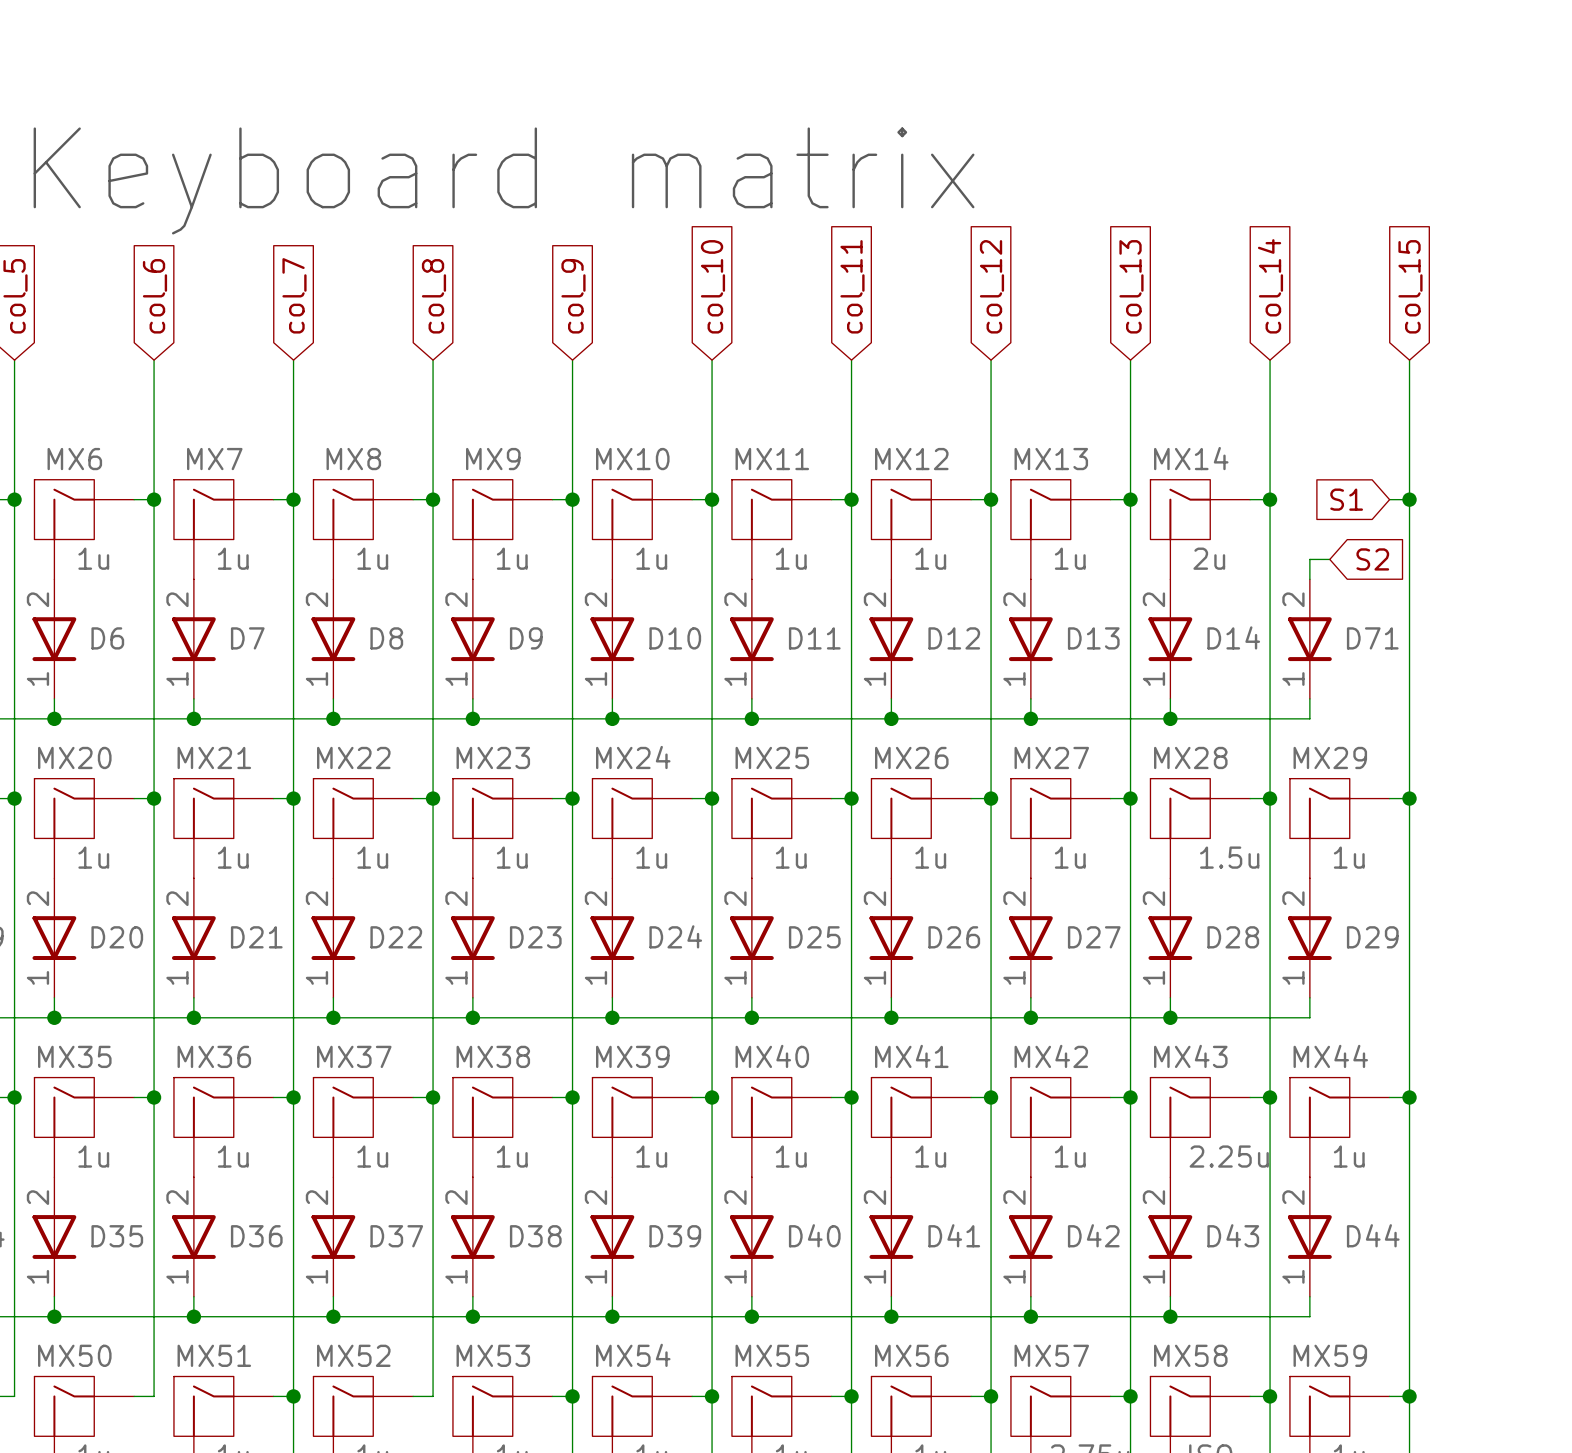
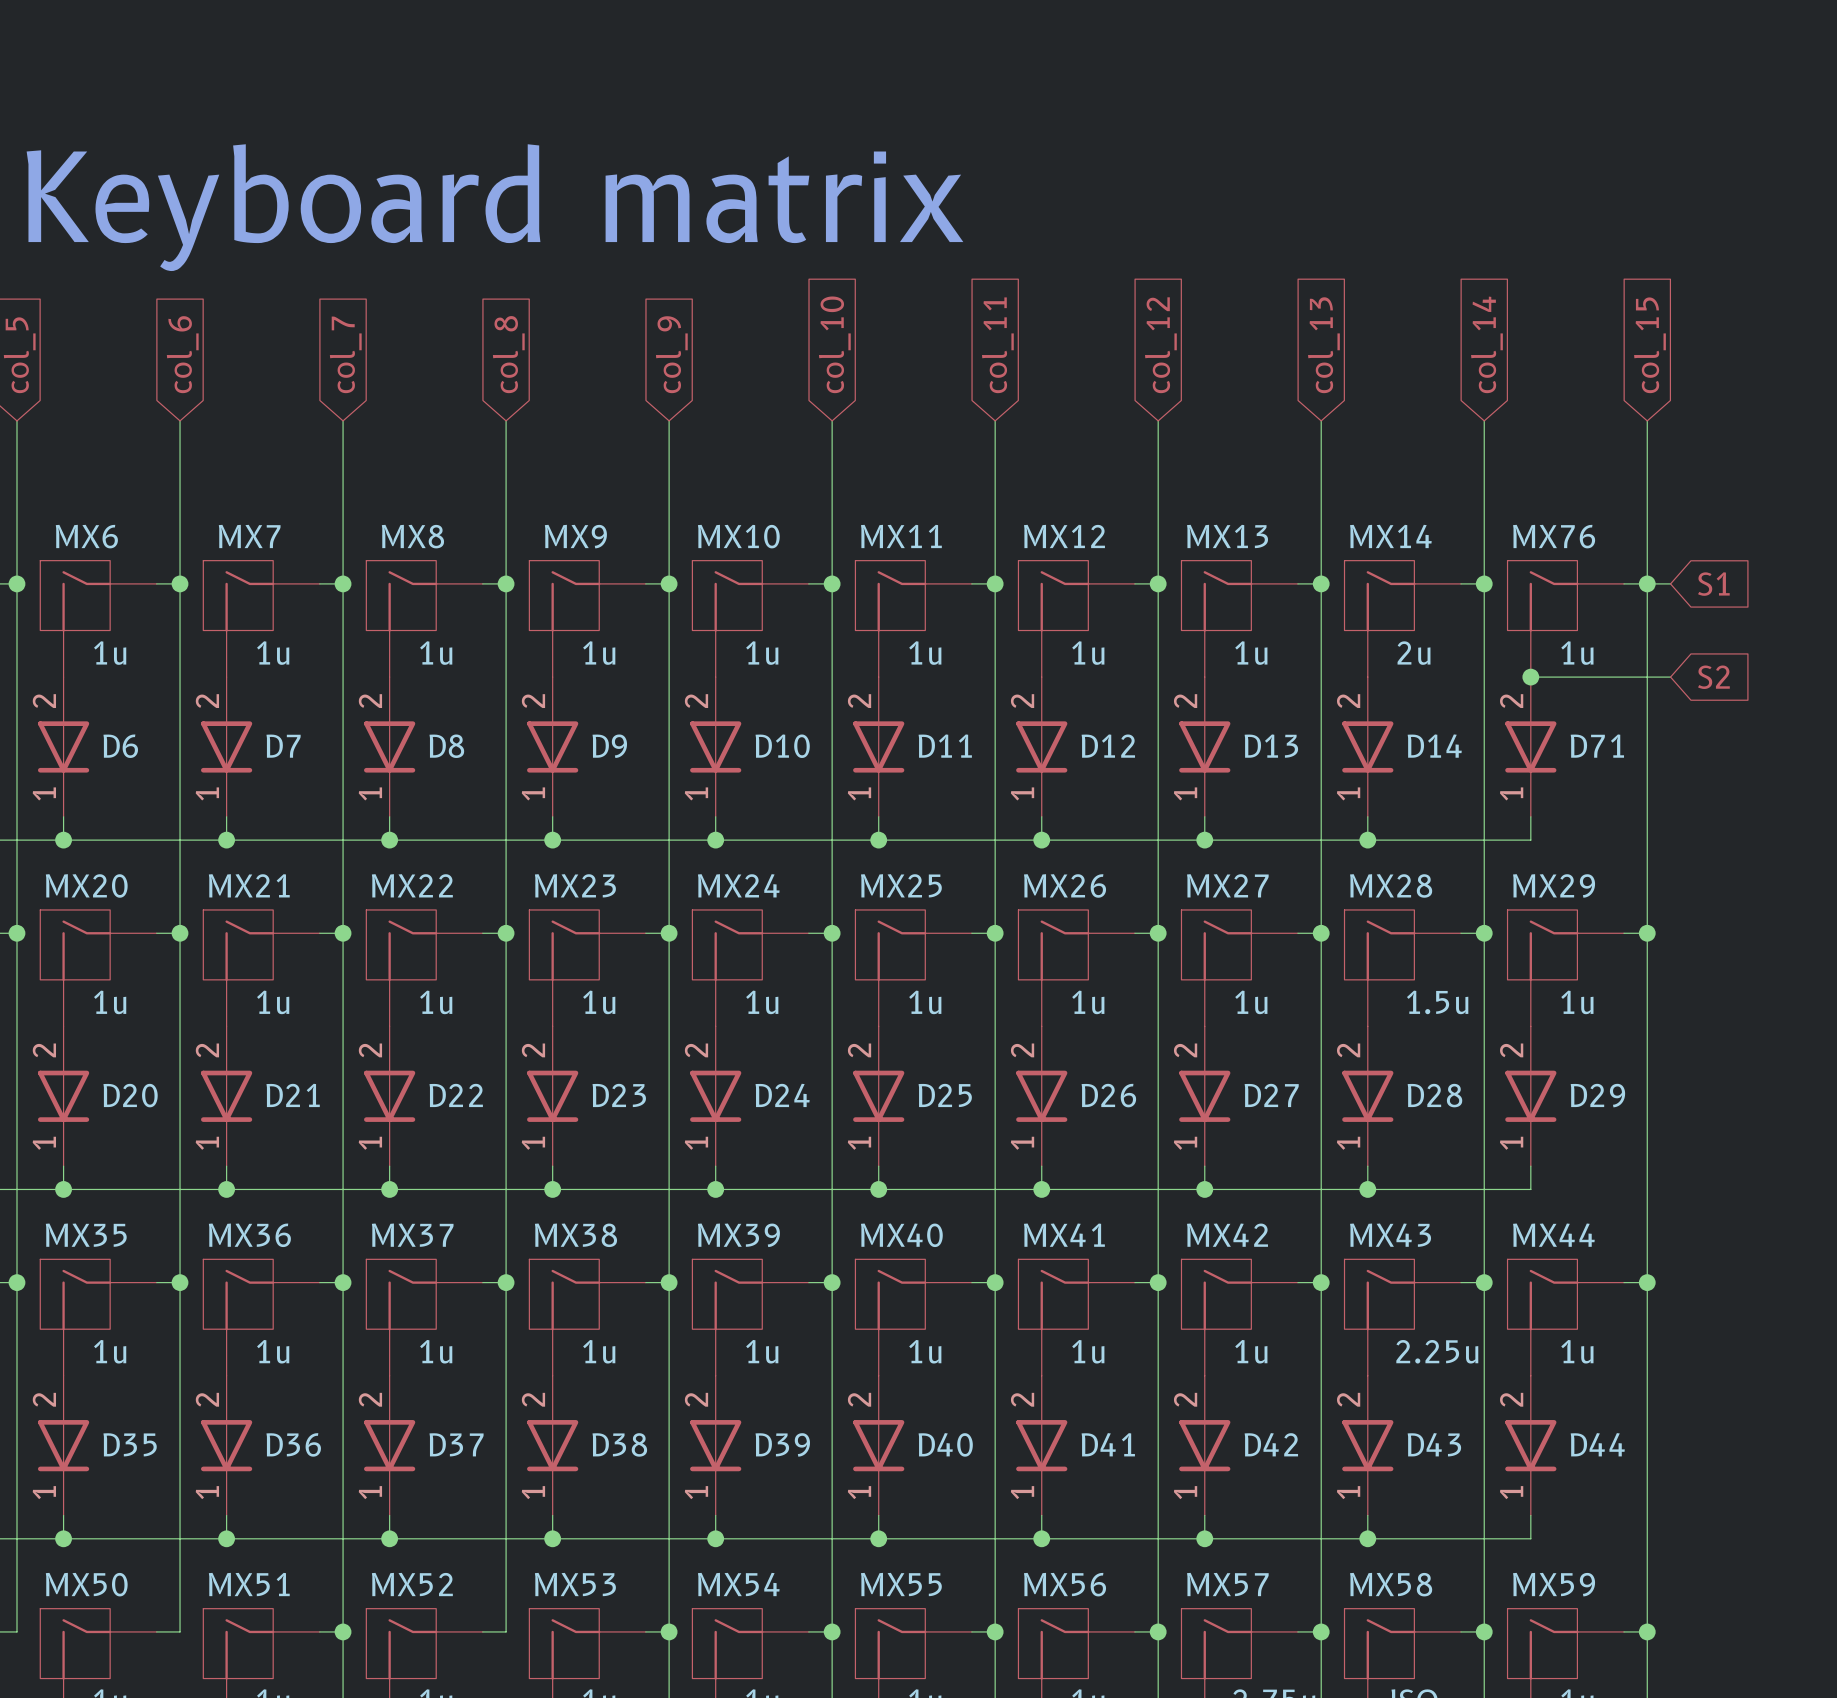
global label rotation: 0° (1346, 499) -> 180° (1713, 584)
global label position: S1 (1346, 499) -> S1 (1713, 584)
wire: none -> (1647, 583) (1670, 583)
MX76: none -> (1565, 618)
wire: (1329, 559) (1309, 559) (1309, 579) -> (1670, 677) (1530, 677)
global label position: S2 (1372, 559) -> S2 (1713, 677)
junction: none -> (1530, 677)

